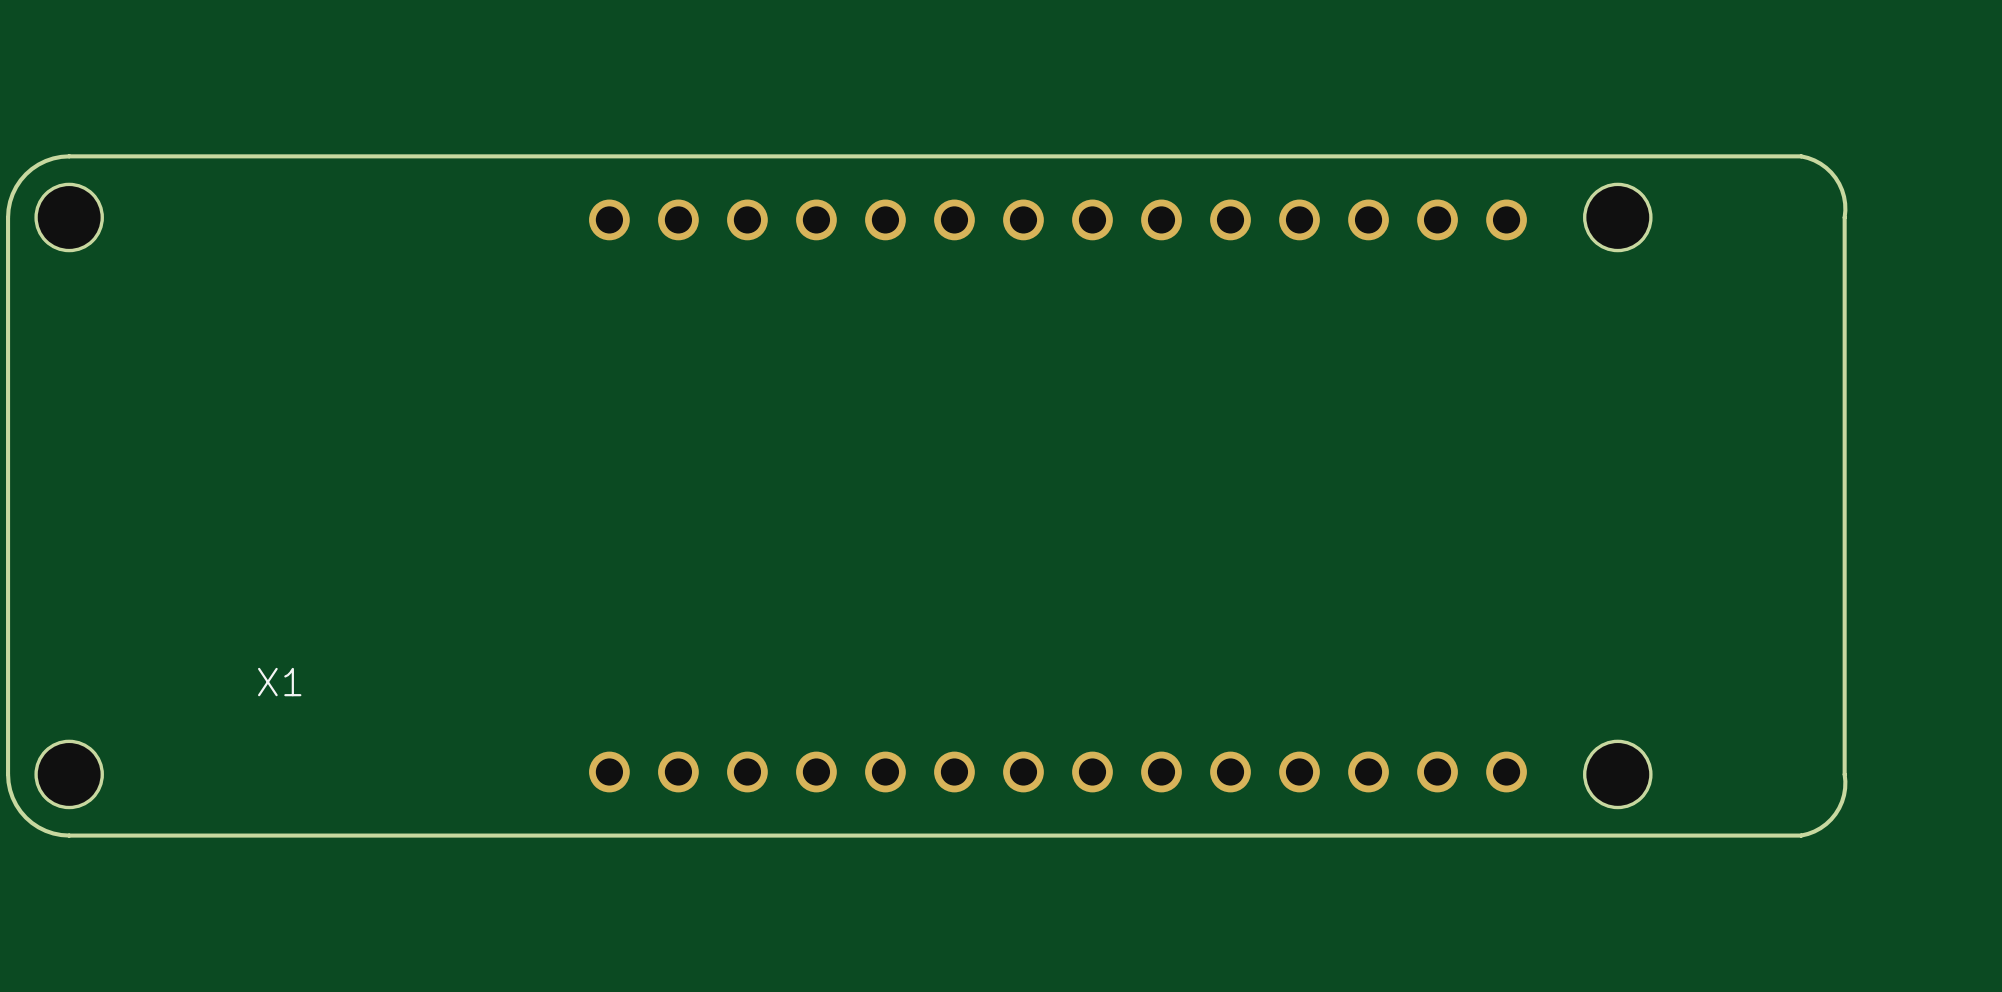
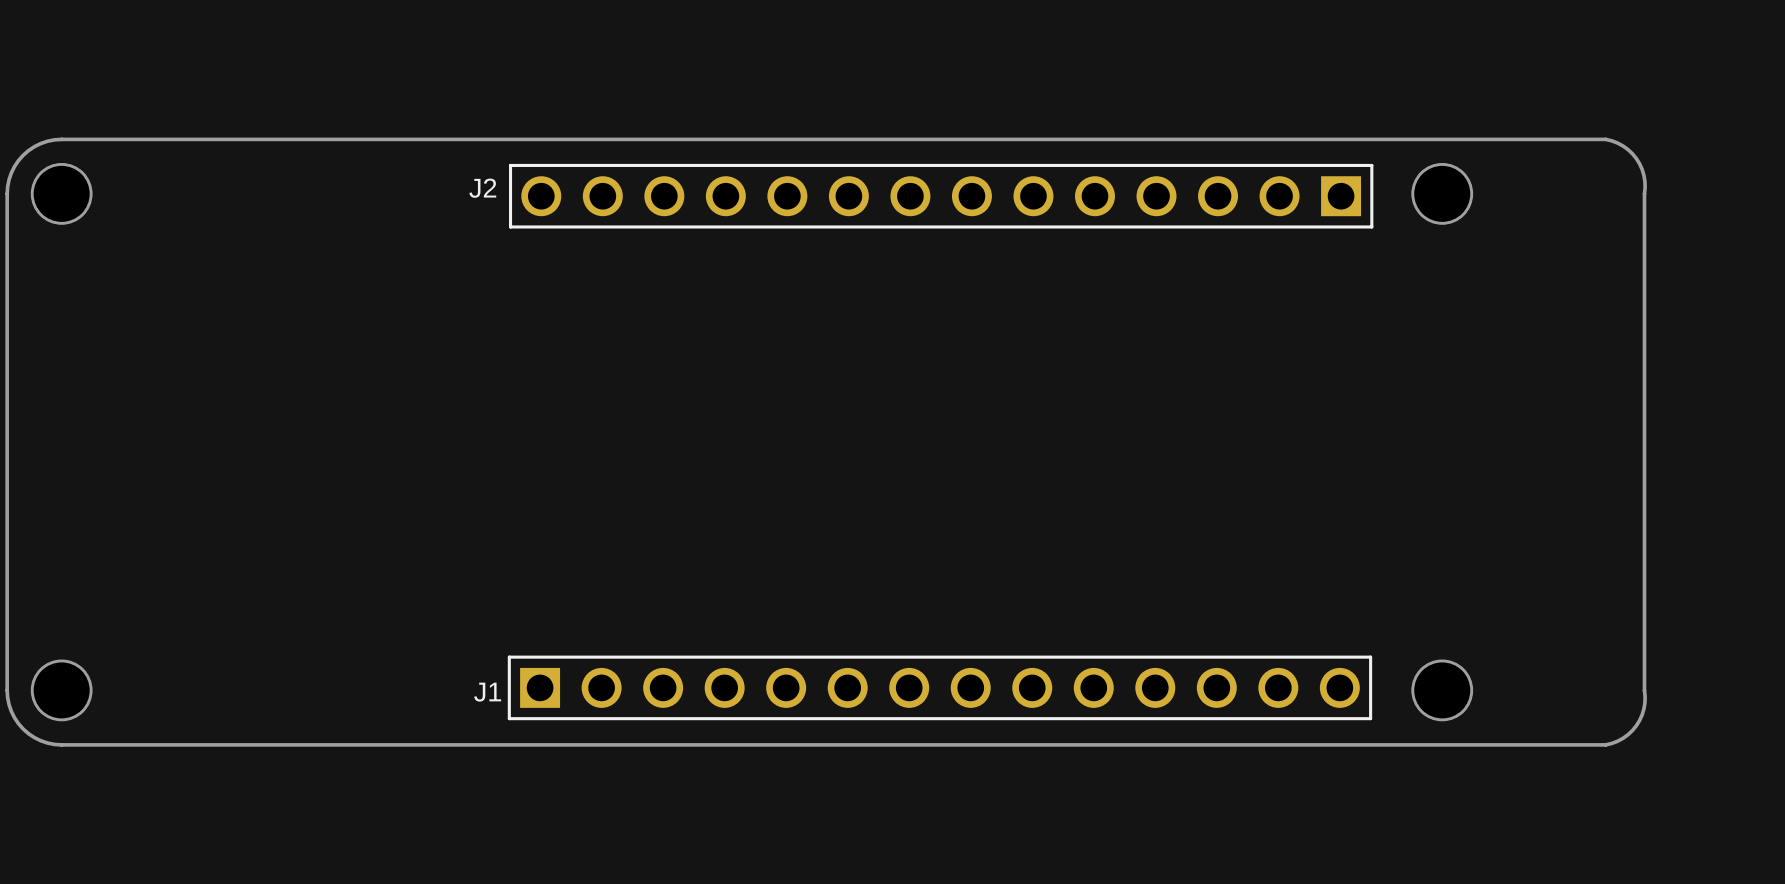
part: (1057, 219) -> none
J2: none -> (941, 196)
text: X1 (279, 682) -> none
J1: none -> (939, 687)
part: (1057, 772) -> none

